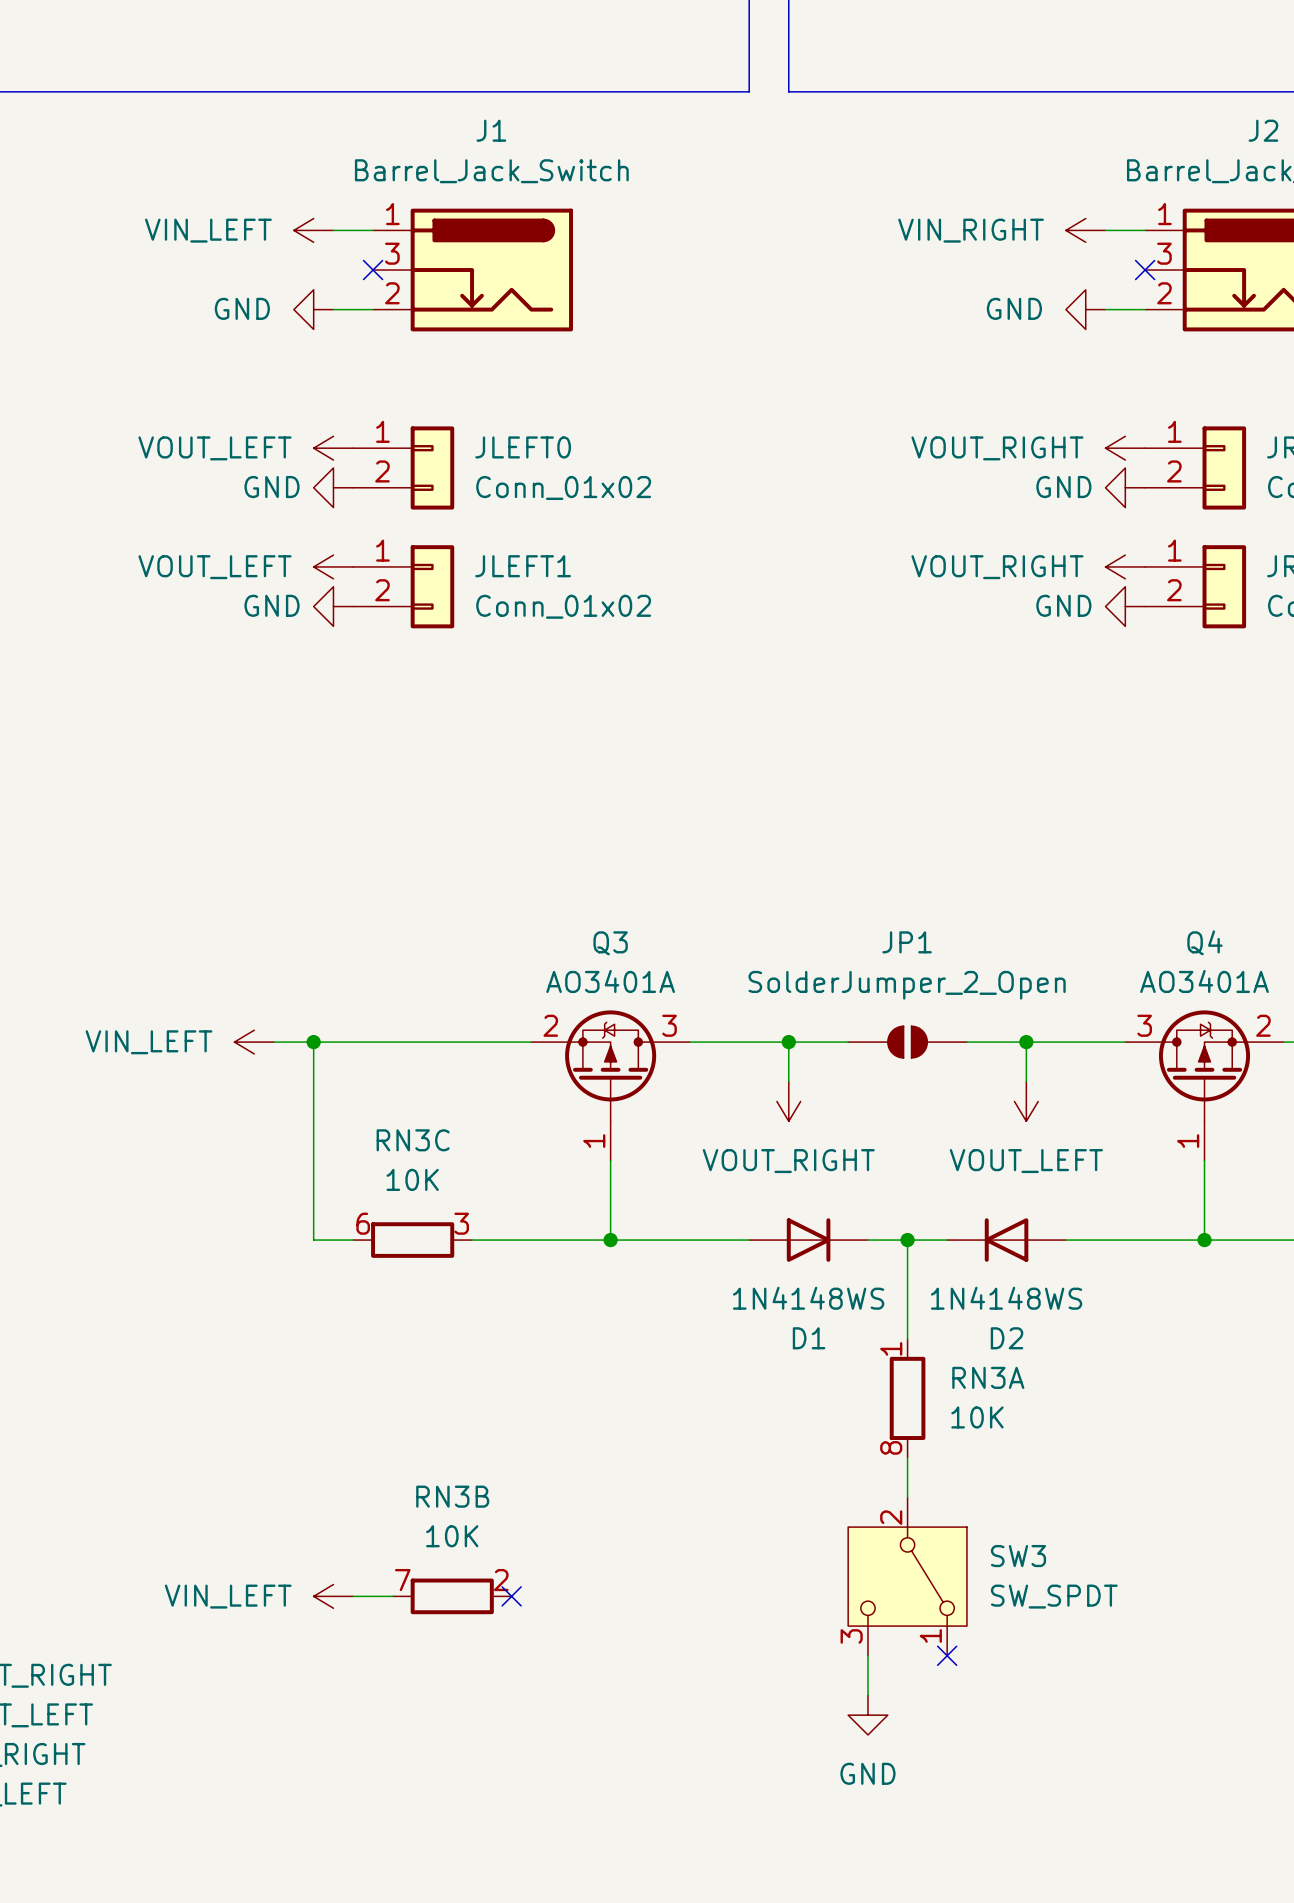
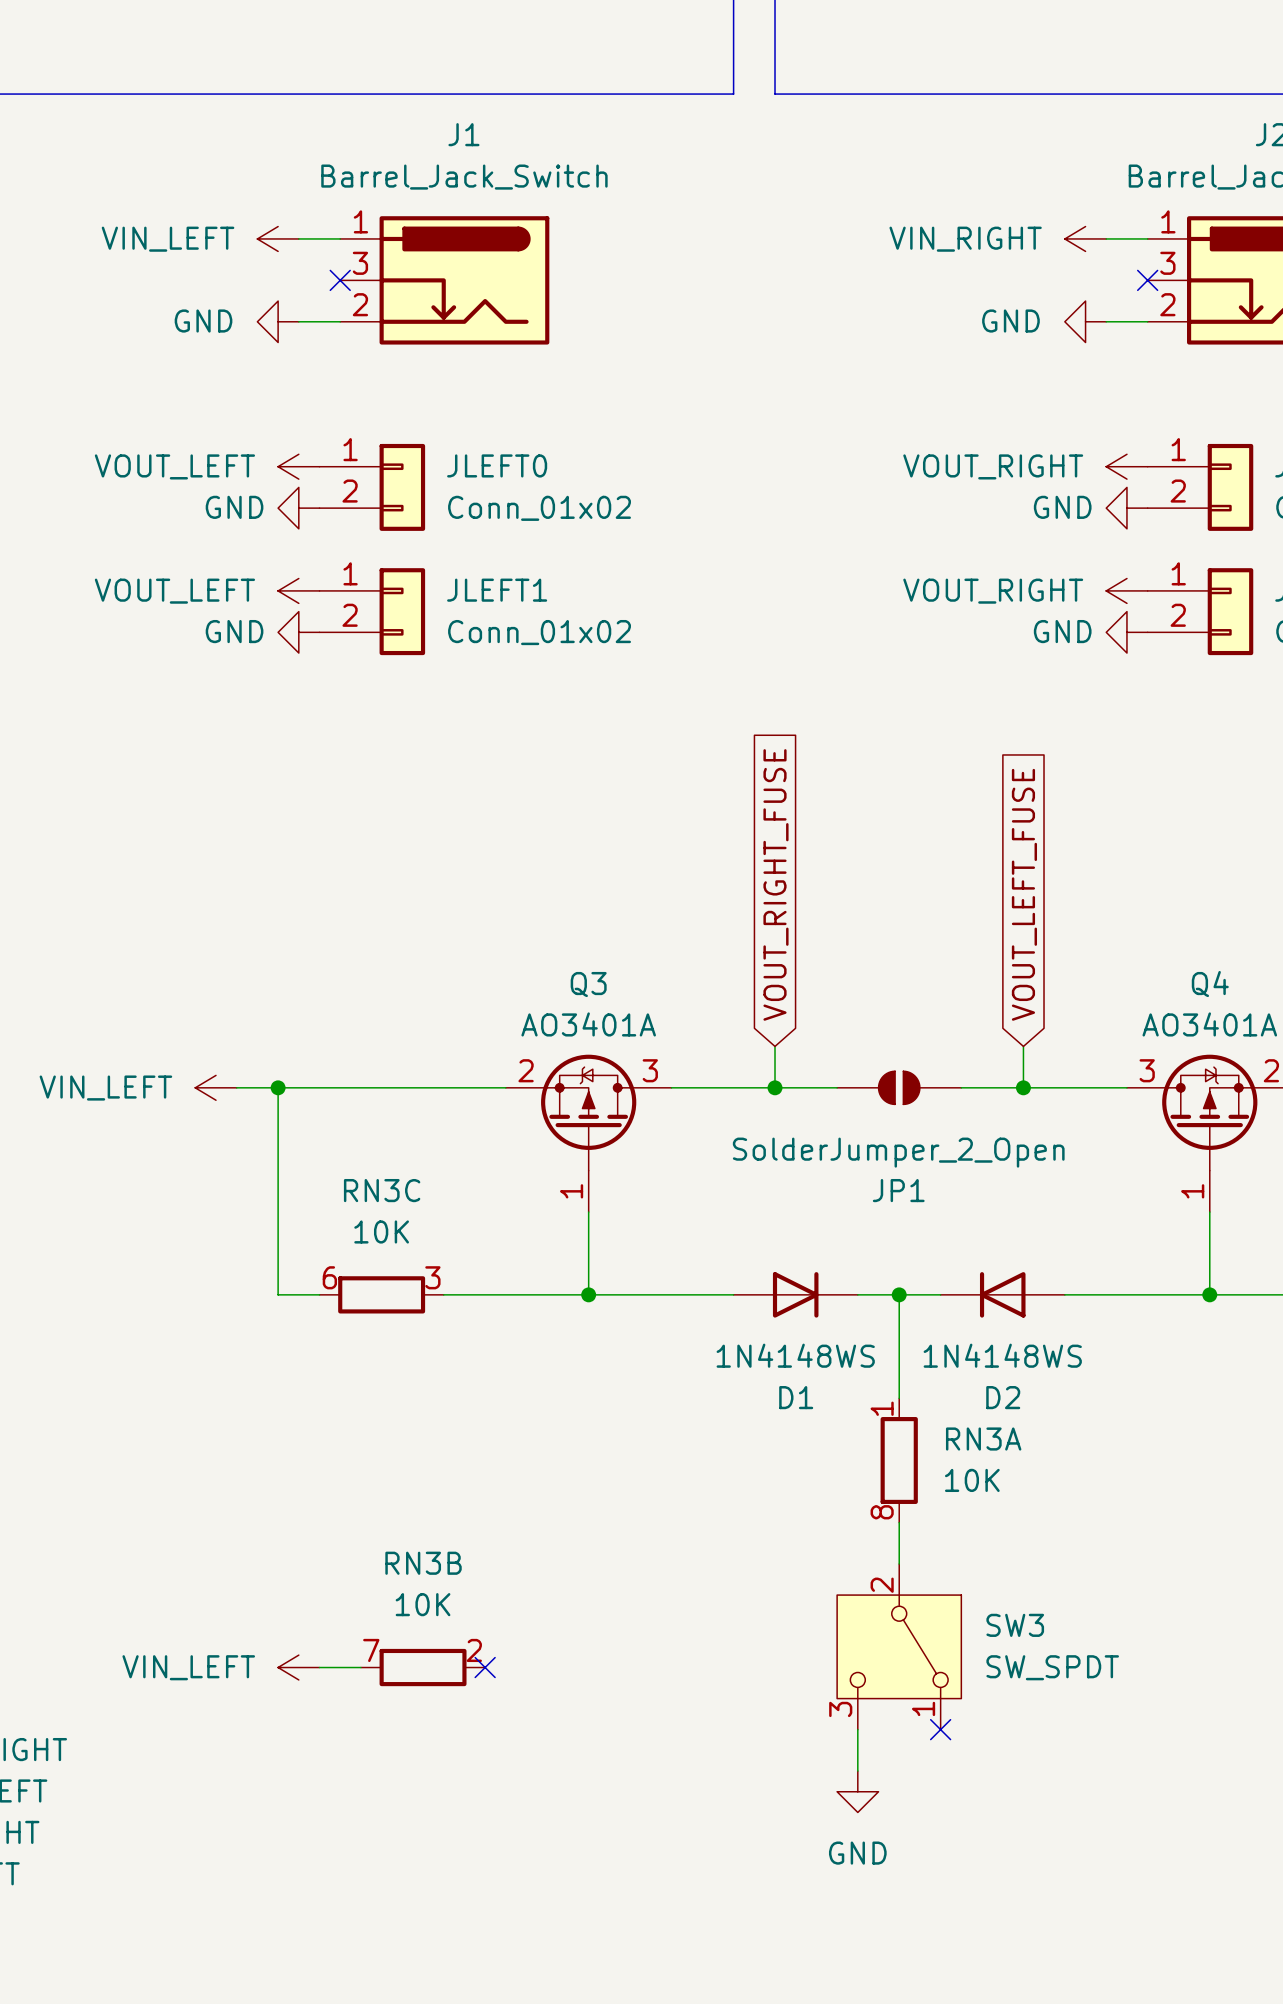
global label: none -> VOUT_RIGHT_FUSE (775, 884)
global label: none -> VOUT_LEFT_FUSE (1024, 894)
JP1 name position: JP1 (907, 942) -> JP1 (898, 1190)
JP1 value position: SolderJumper_2_Open (907, 985) -> SolderJumper_2_Open (898, 1152)
wire: (788, 1042) (788, 1081) -> (775, 1087) (775, 1046)
wire: (1026, 1042) (1026, 1081) -> (1023, 1087) (1023, 1046)
power symbol: VOUT_RIGHT (788, 1101) -> none
power symbol: VOUT_LEFT (1026, 1101) -> none

